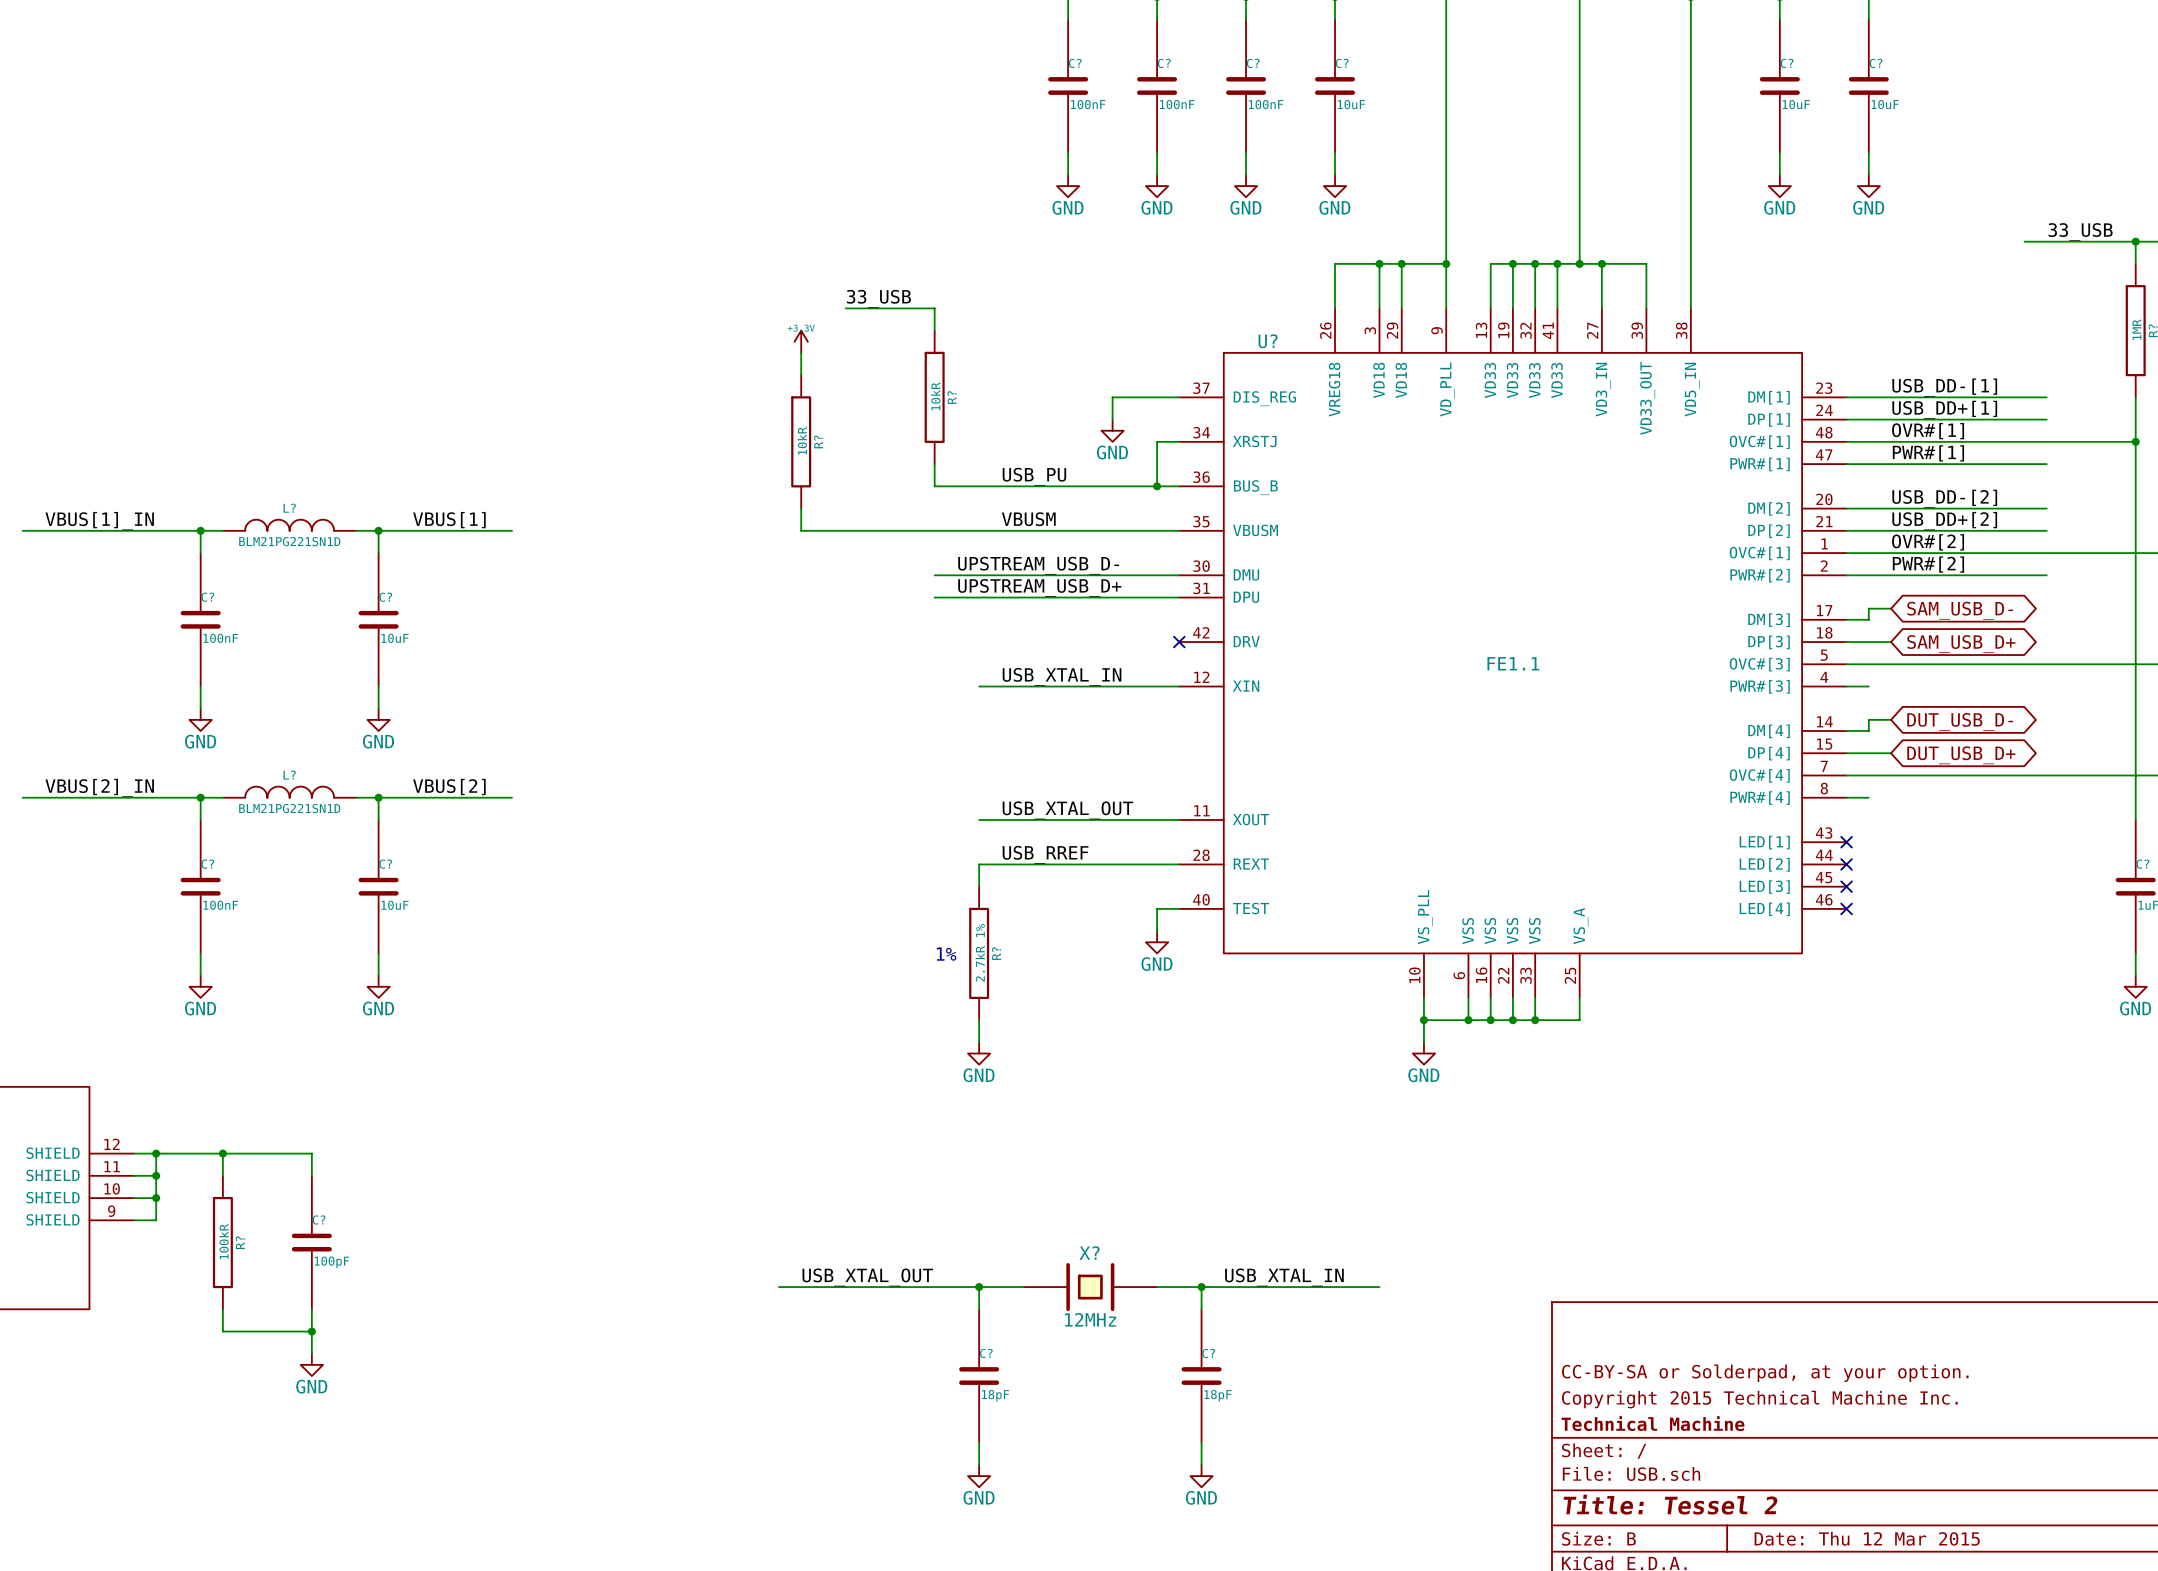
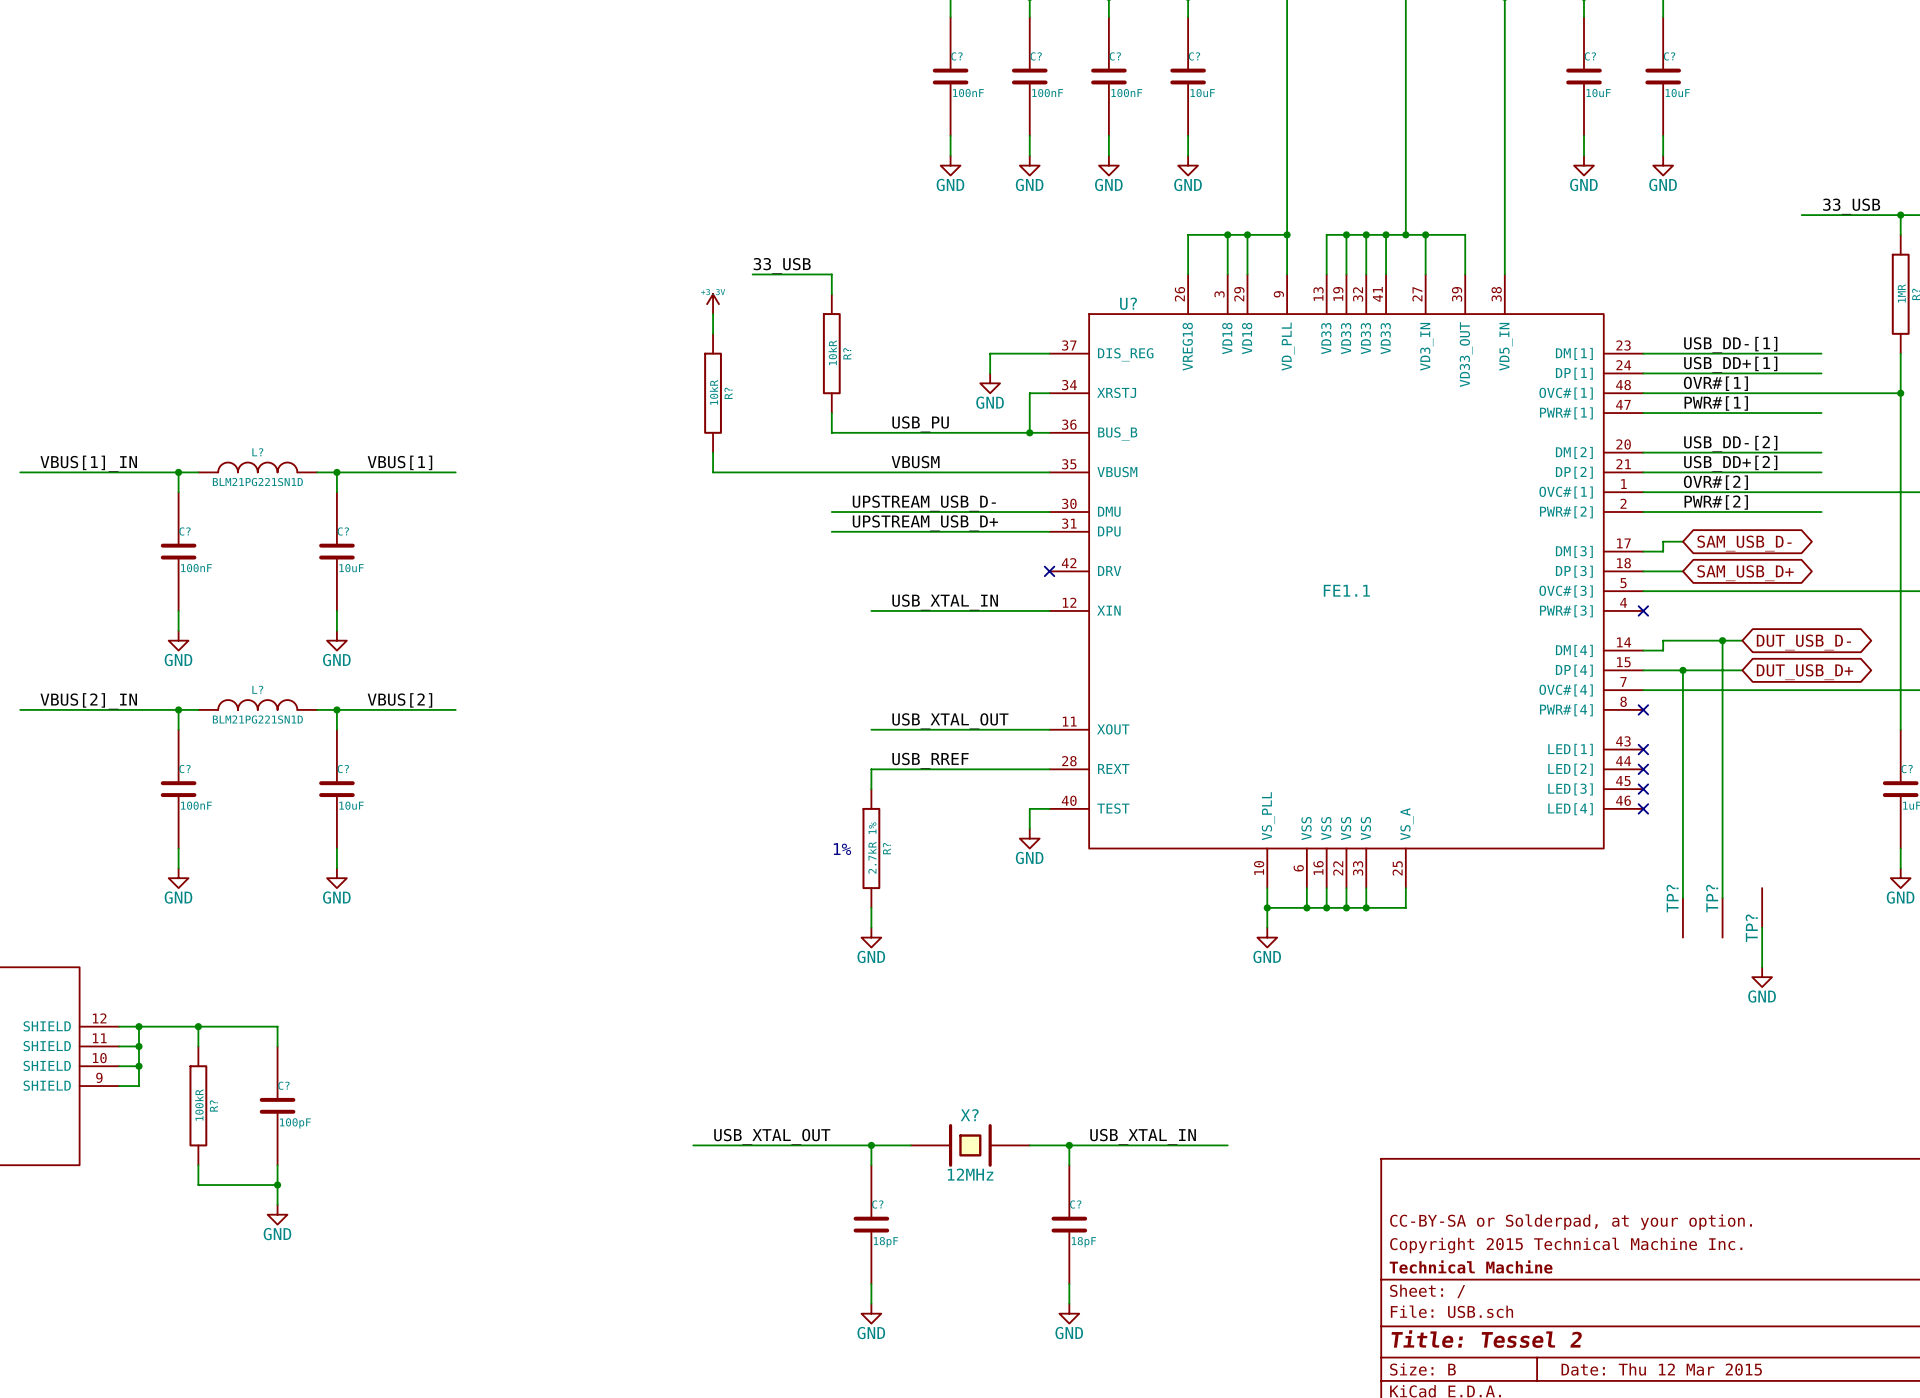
wire: (1846, 686) (1868, 686) -> none
no-connect mark: none -> (1643, 610)
wire: none -> (1682, 640) (1742, 640)
wire: none -> (1722, 640) (1722, 897)
junction: none -> (1722, 640)
global label position: DUT_USB_D- (1960, 721) -> DUT_USB_D- (1803, 642)
junction: none -> (1682, 670)
wire: none -> (1742, 670) (1682, 670) (1682, 897)
global label position: DUT_USB_D+ (1961, 755) -> DUT_USB_D+ (1804, 672)
wire: (1846, 797) (1868, 797) -> none
no-connect mark: none -> (1643, 709)
TP?: none -> (1762, 907)
TP?: none -> (1682, 917)
TP?: none -> (1722, 917)
wire: none -> (1762, 927) (1762, 967)
power symbol: none -> GND (1762, 977)

